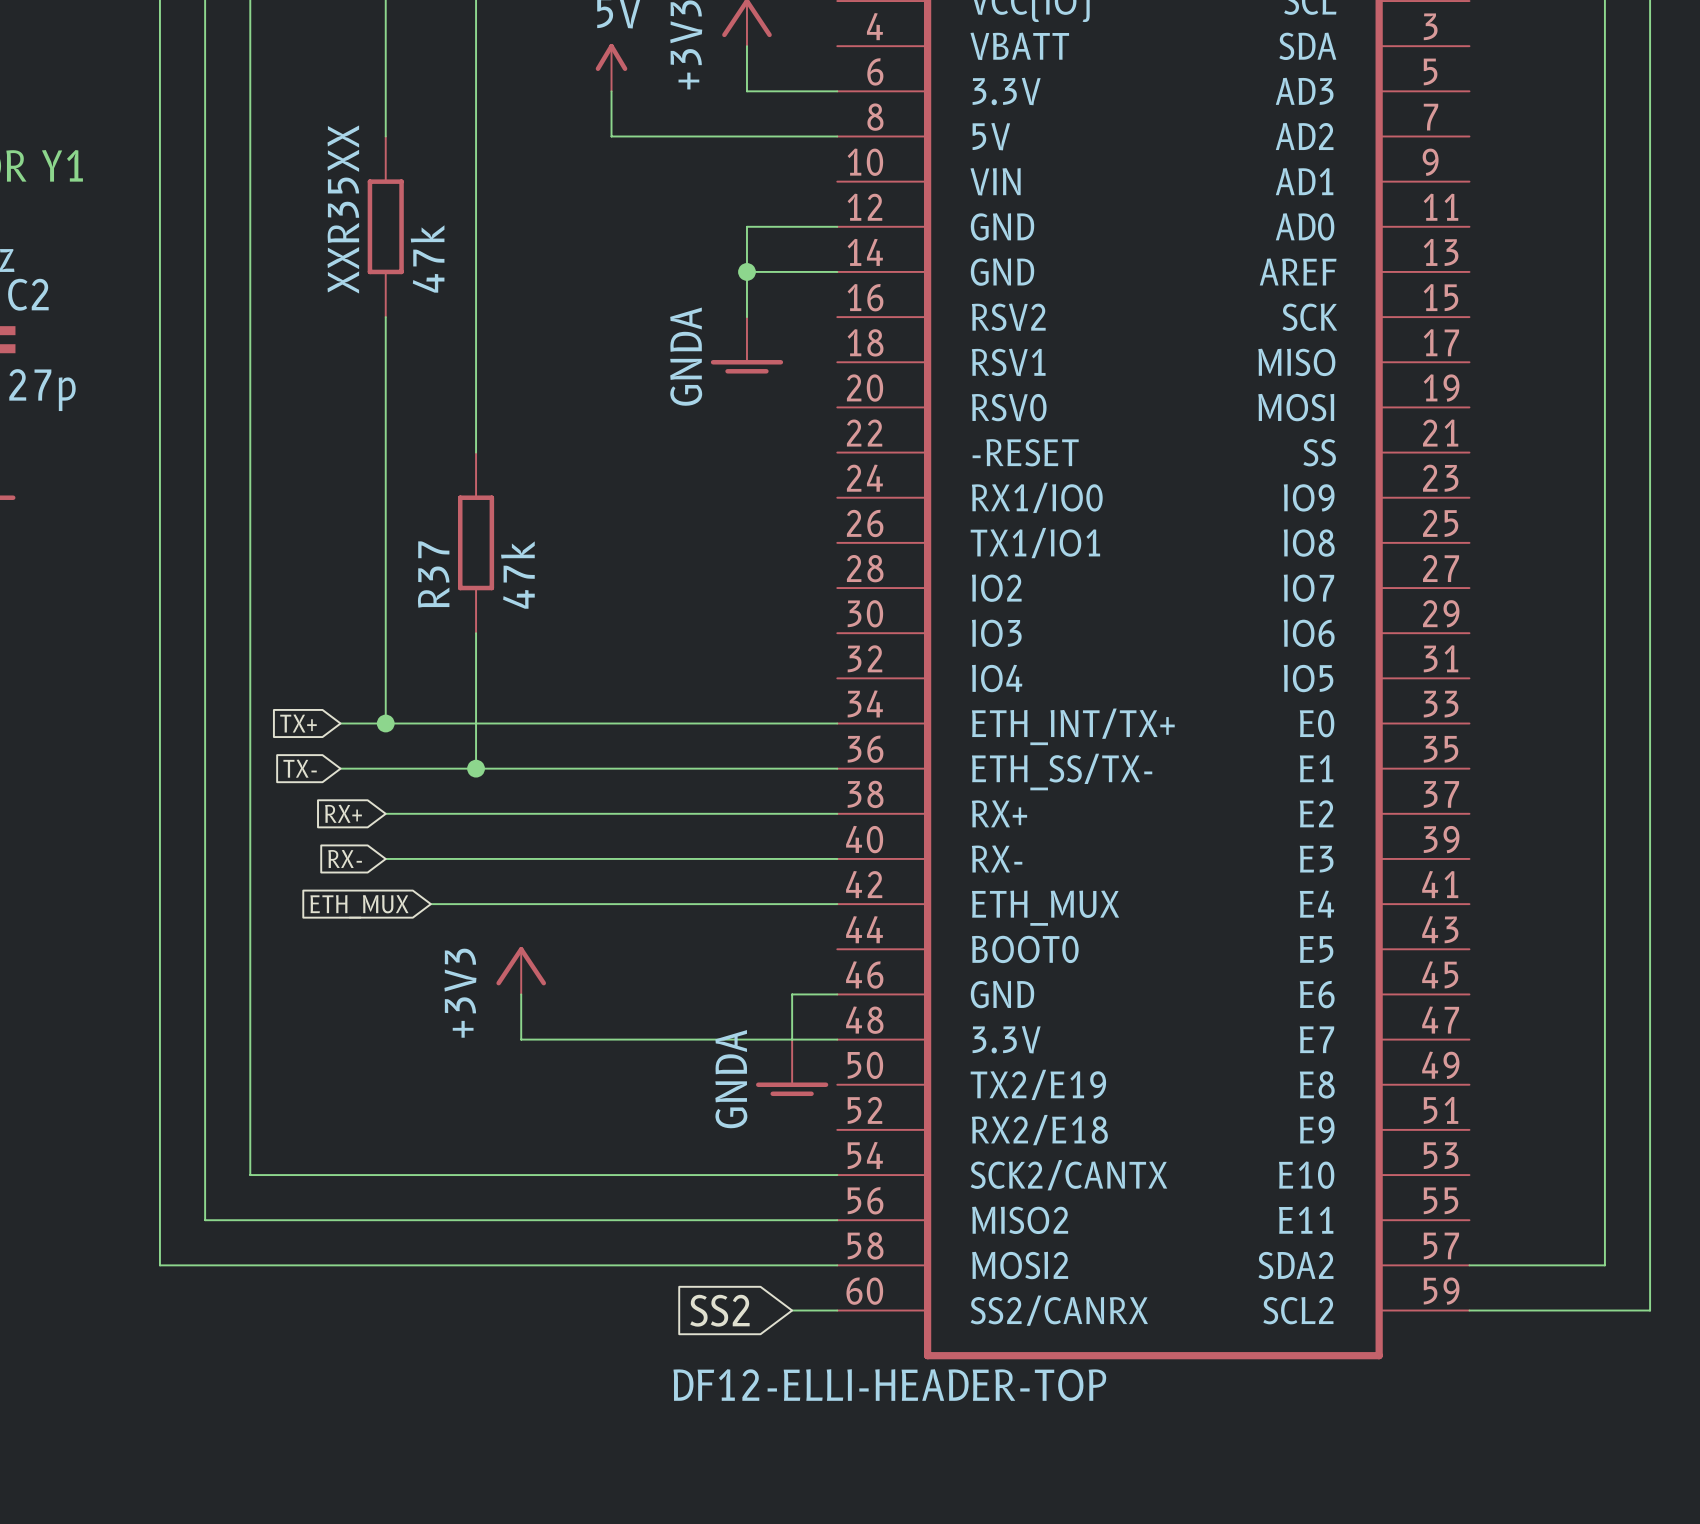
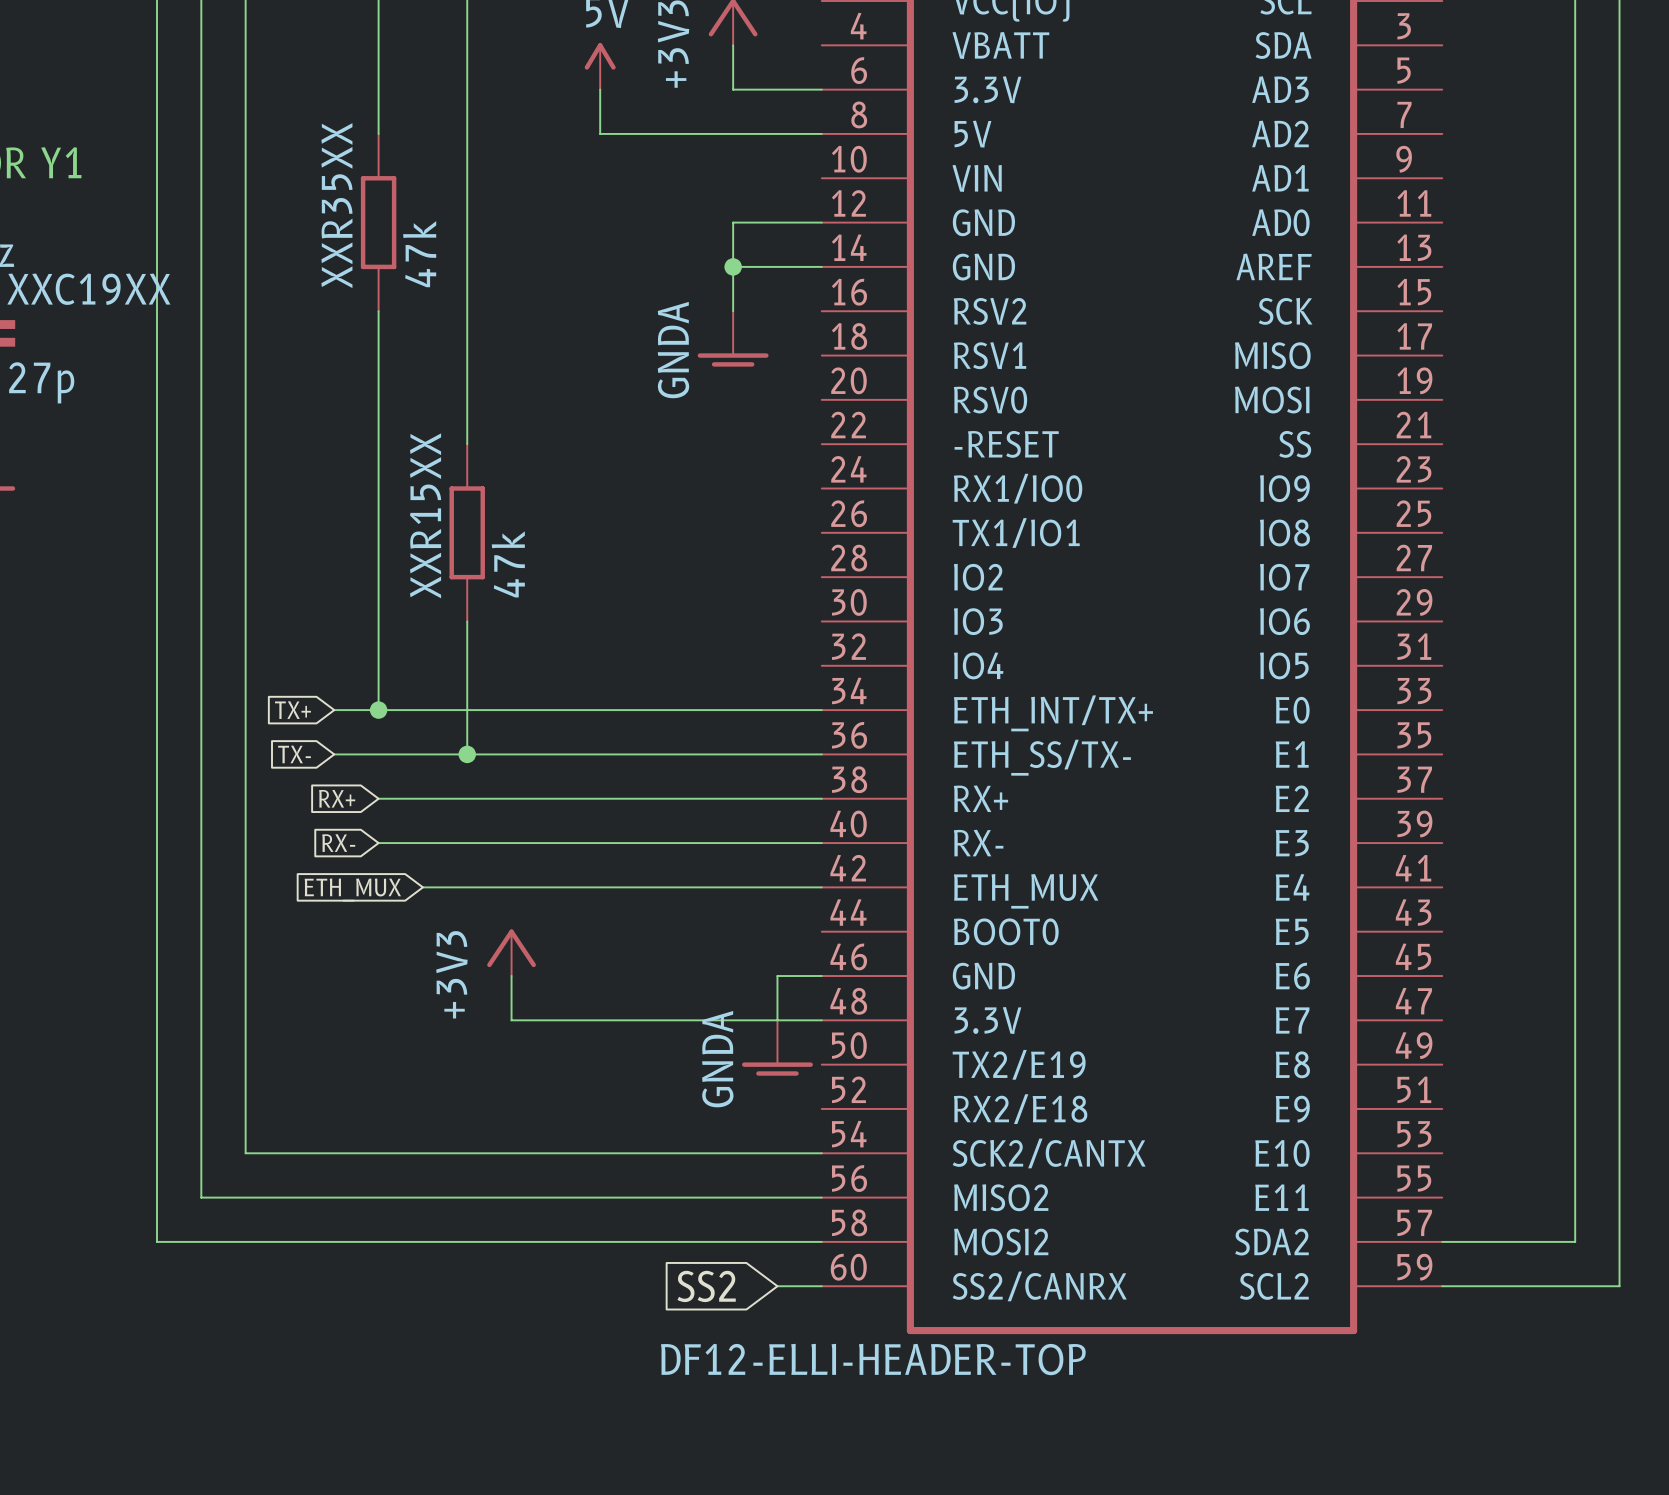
C2 name: C2 (28, 294) -> XXC19XX (88, 289)
R37 name: R37 (433, 574) -> XXR15XX (425, 515)

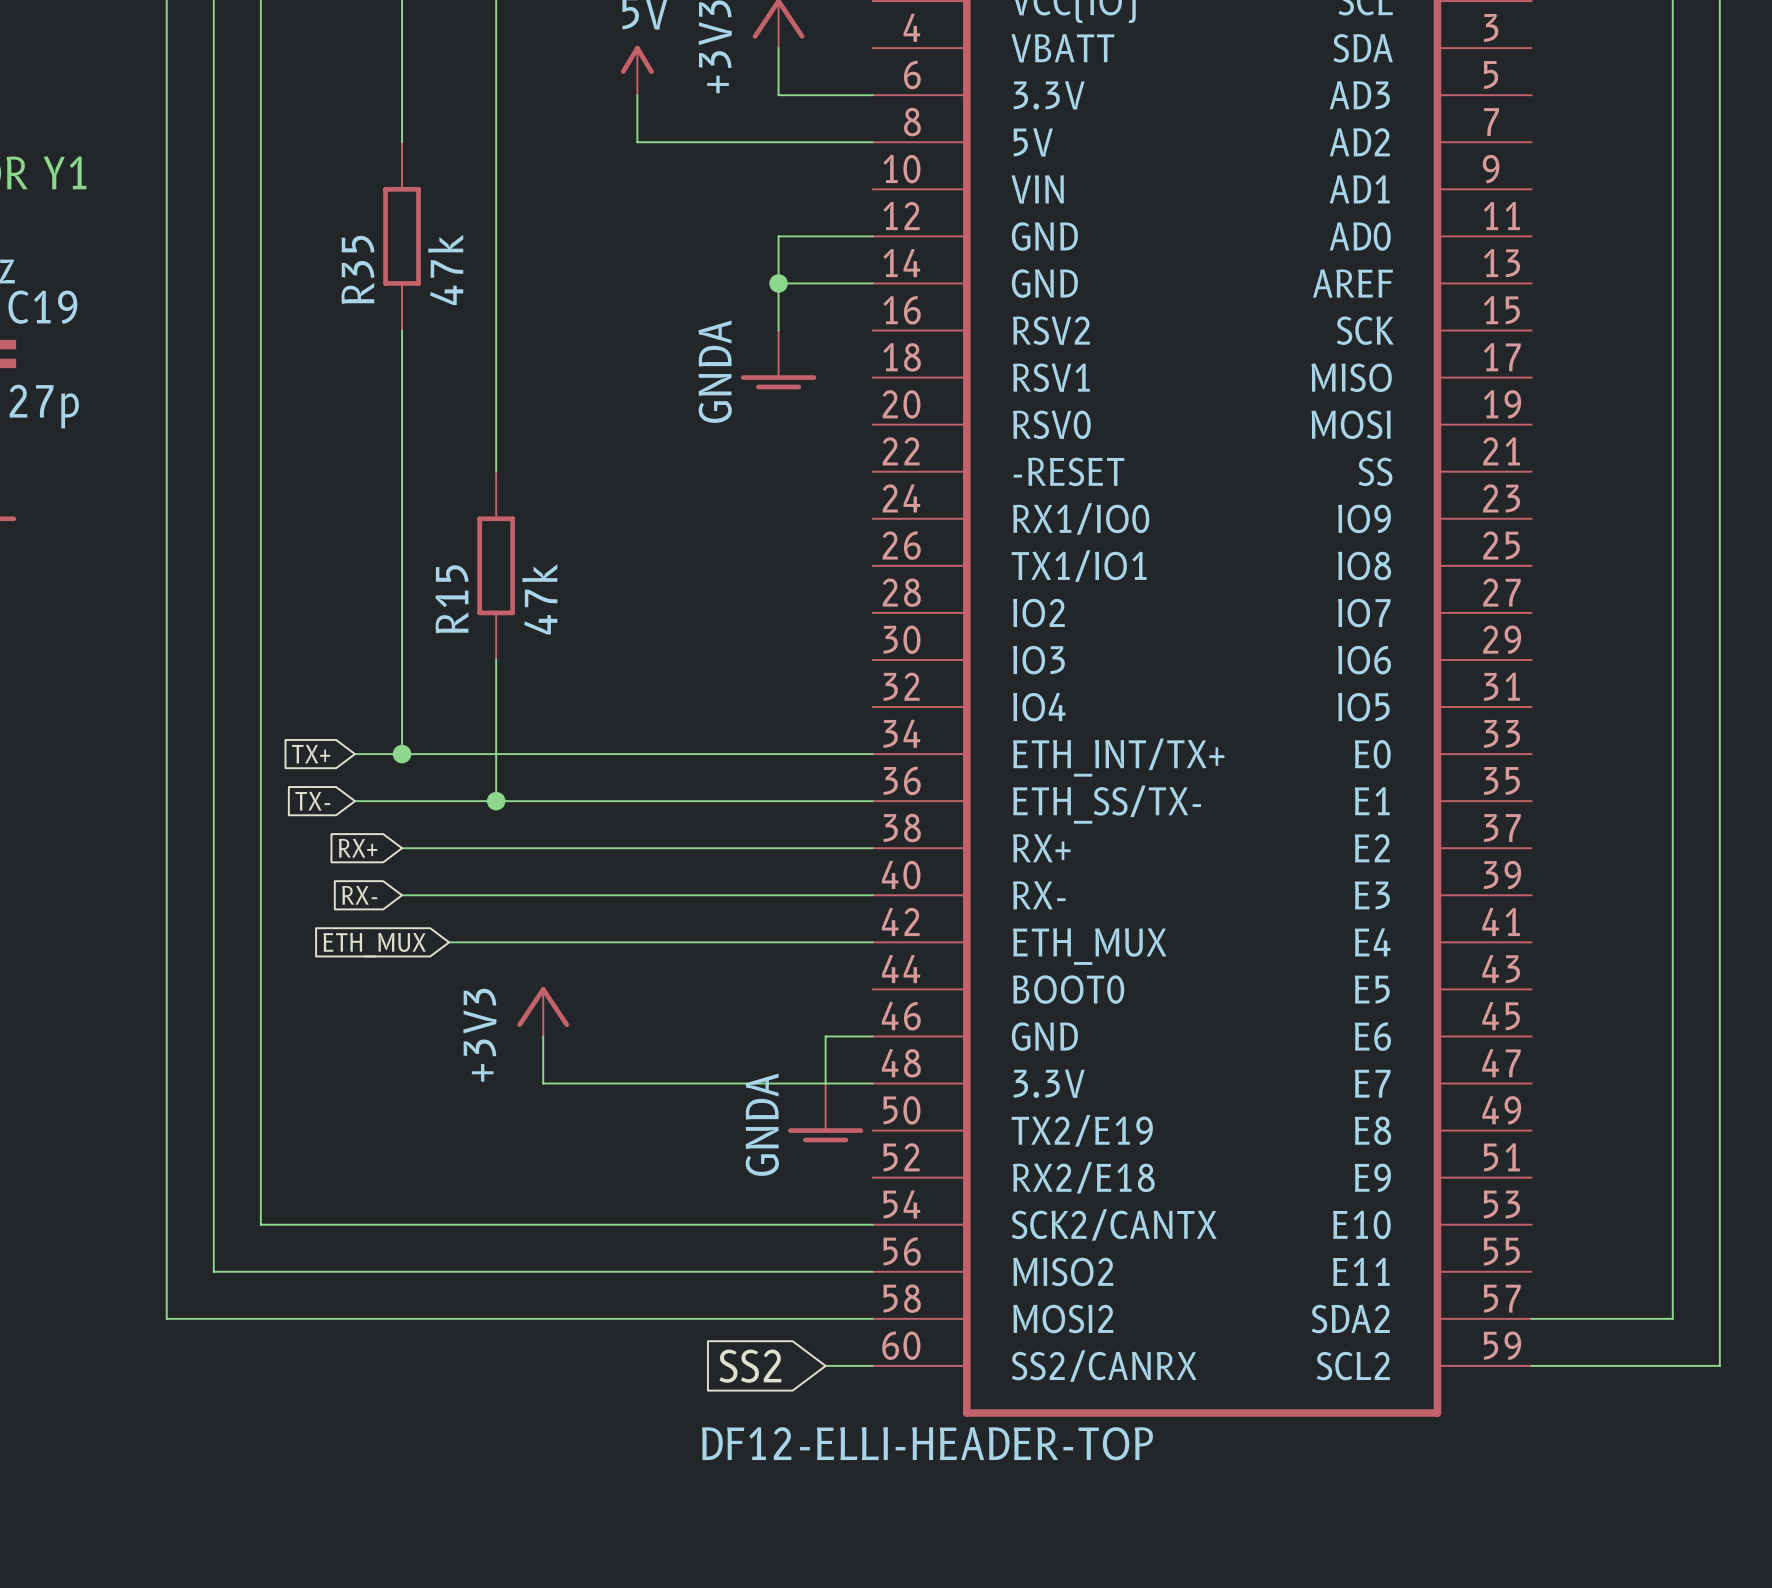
XXR35XX name: XXR35XX (336, 205) -> R35 (357, 269)
XXC19XX name: XXC19XX (88, 289) -> C19 (42, 307)
XXR15XX name: XXR15XX (425, 515) -> R15 (451, 599)

